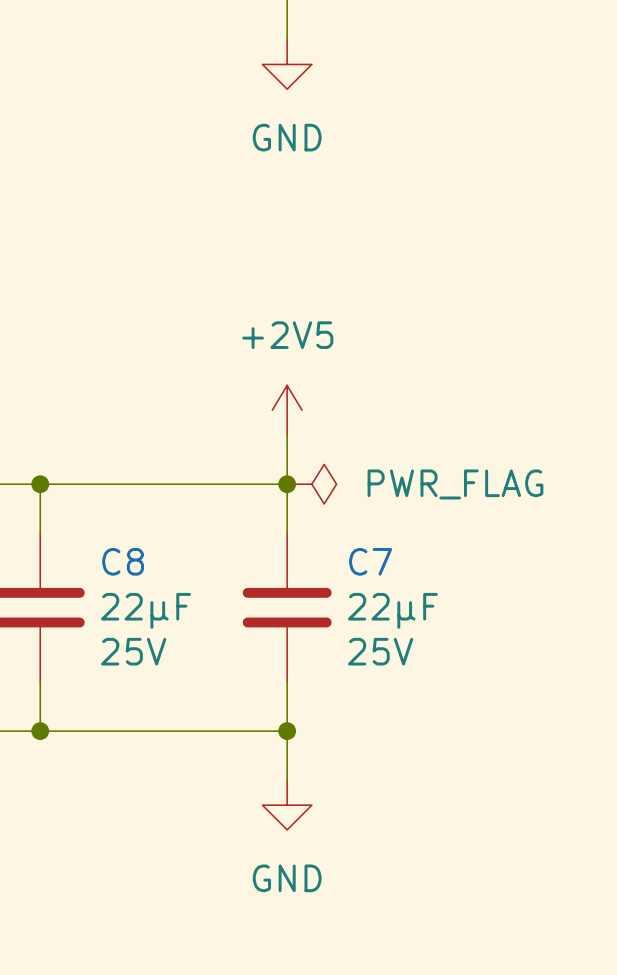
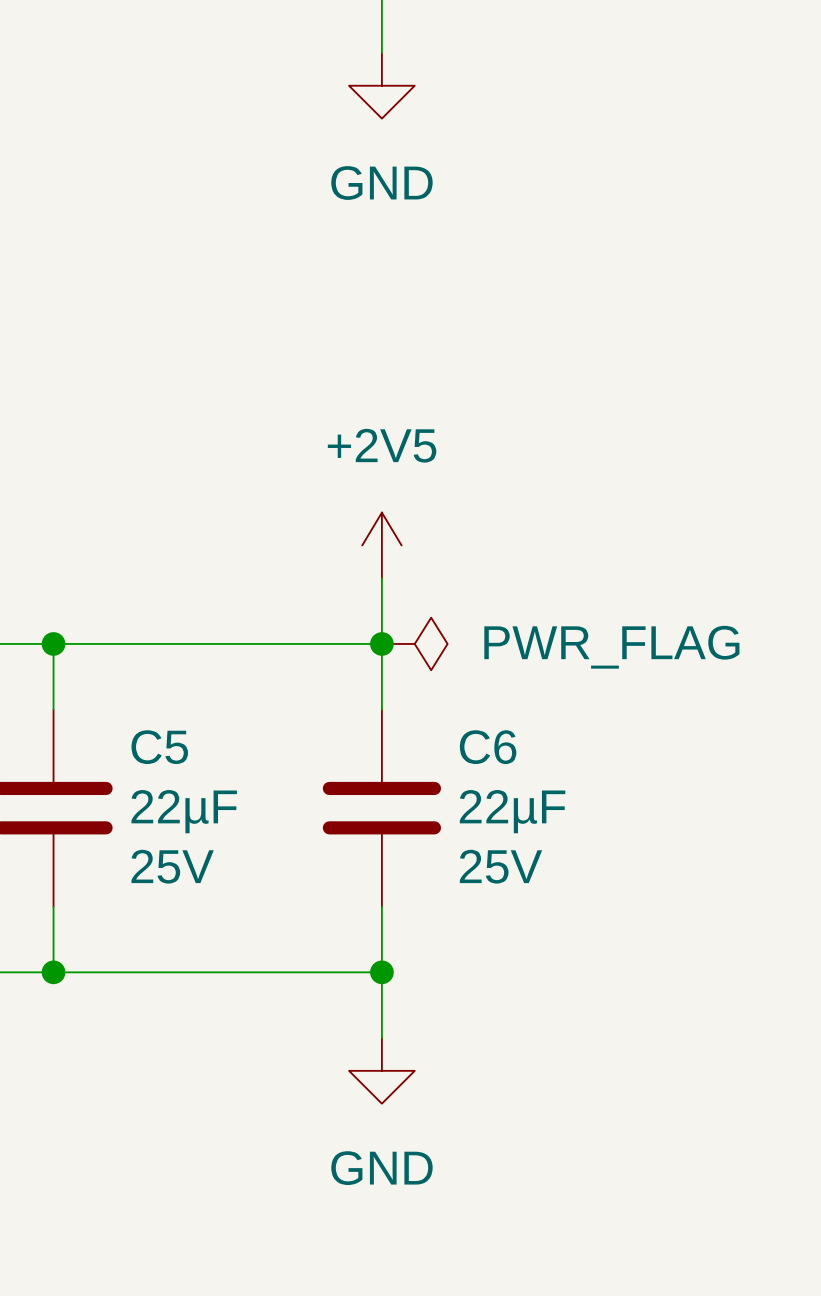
C8 name: C8 (123, 561) -> C5 (159, 747)
C7 name: C7 (370, 561) -> C6 (488, 747)

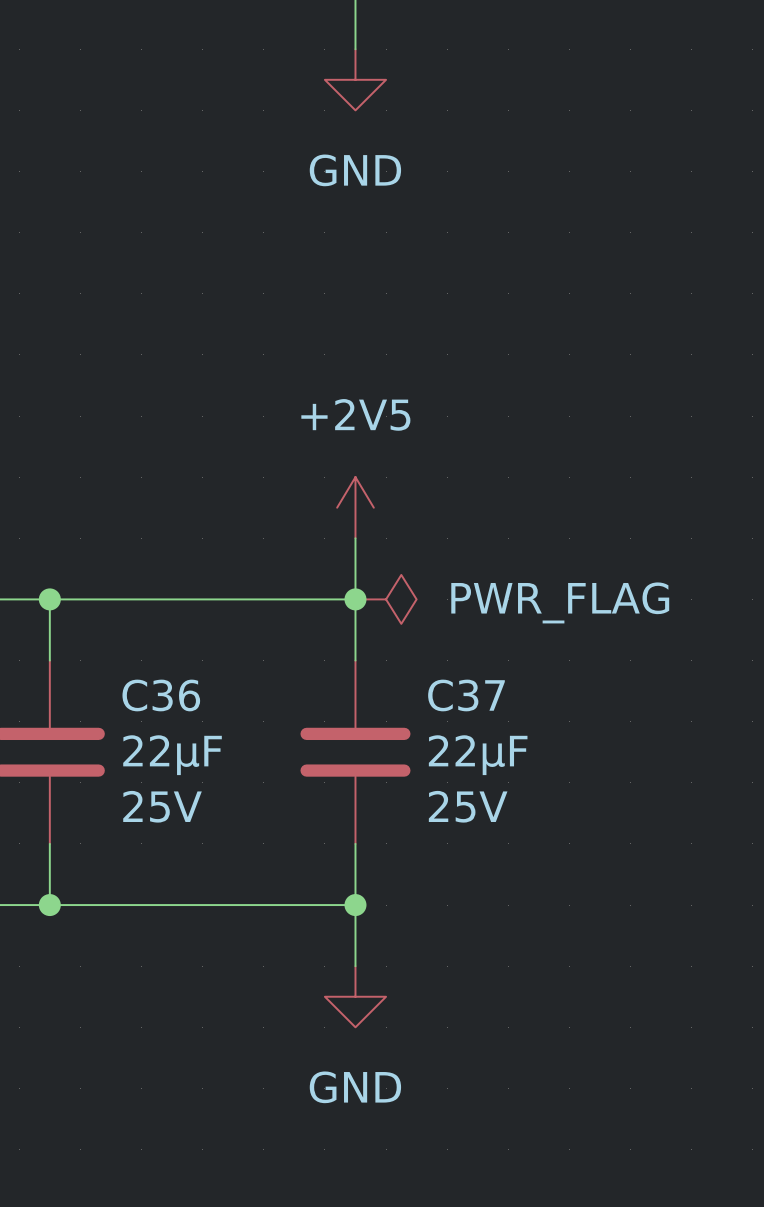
C5 name: C5 (159, 747) -> C36 (161, 695)
C6 name: C6 (488, 747) -> C37 (466, 695)

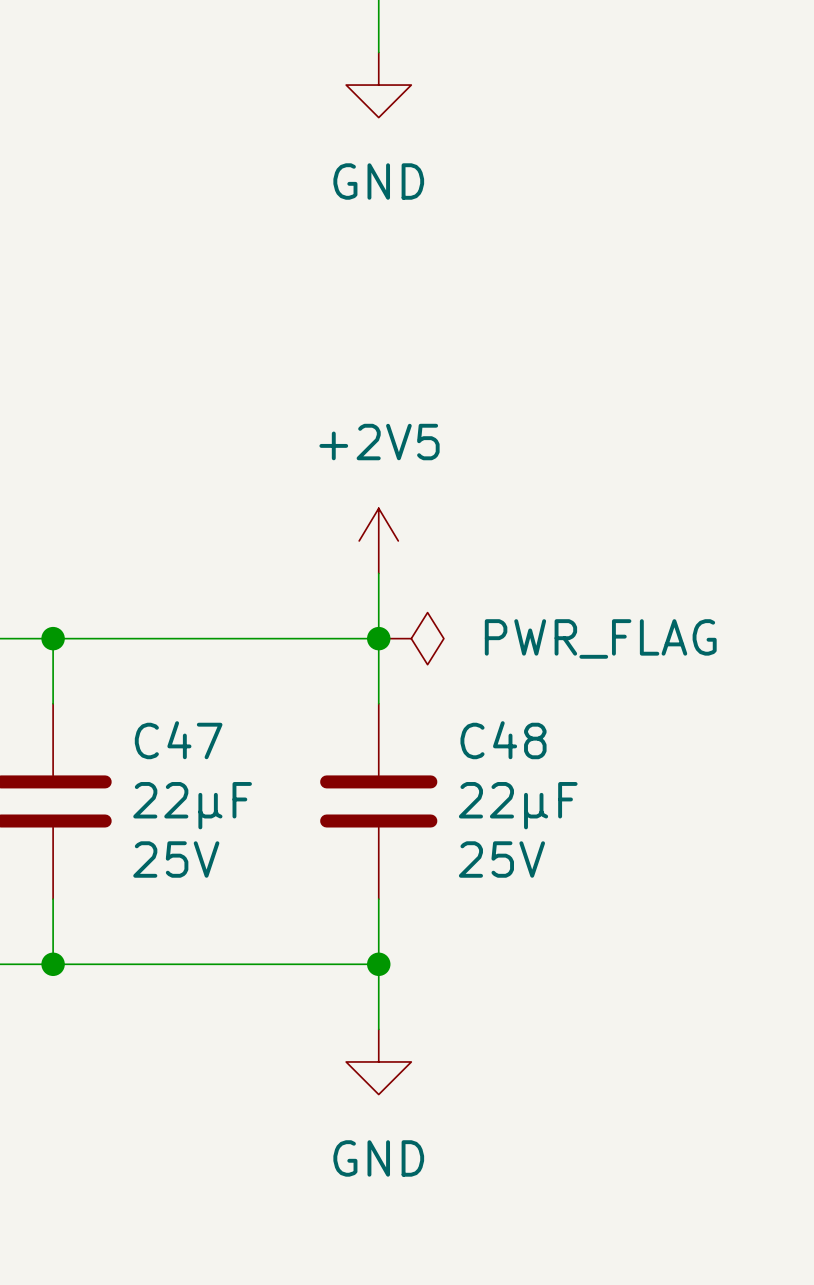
C36 name: C36 (161, 695) -> C47 (178, 740)
C37 name: C37 (466, 695) -> C48 (503, 740)

